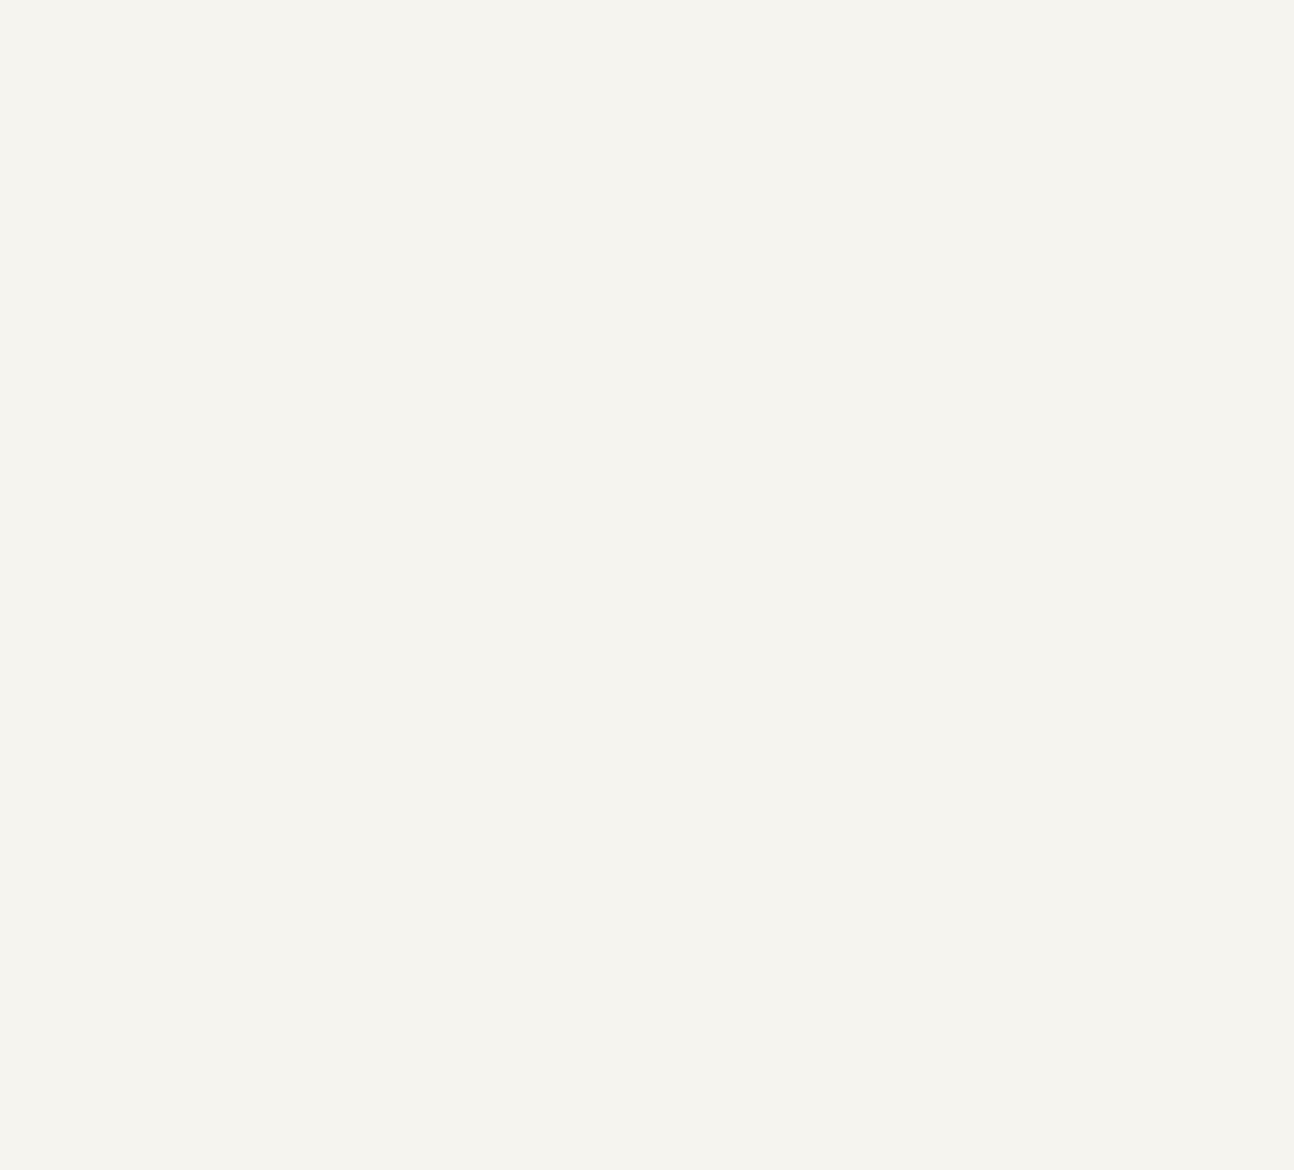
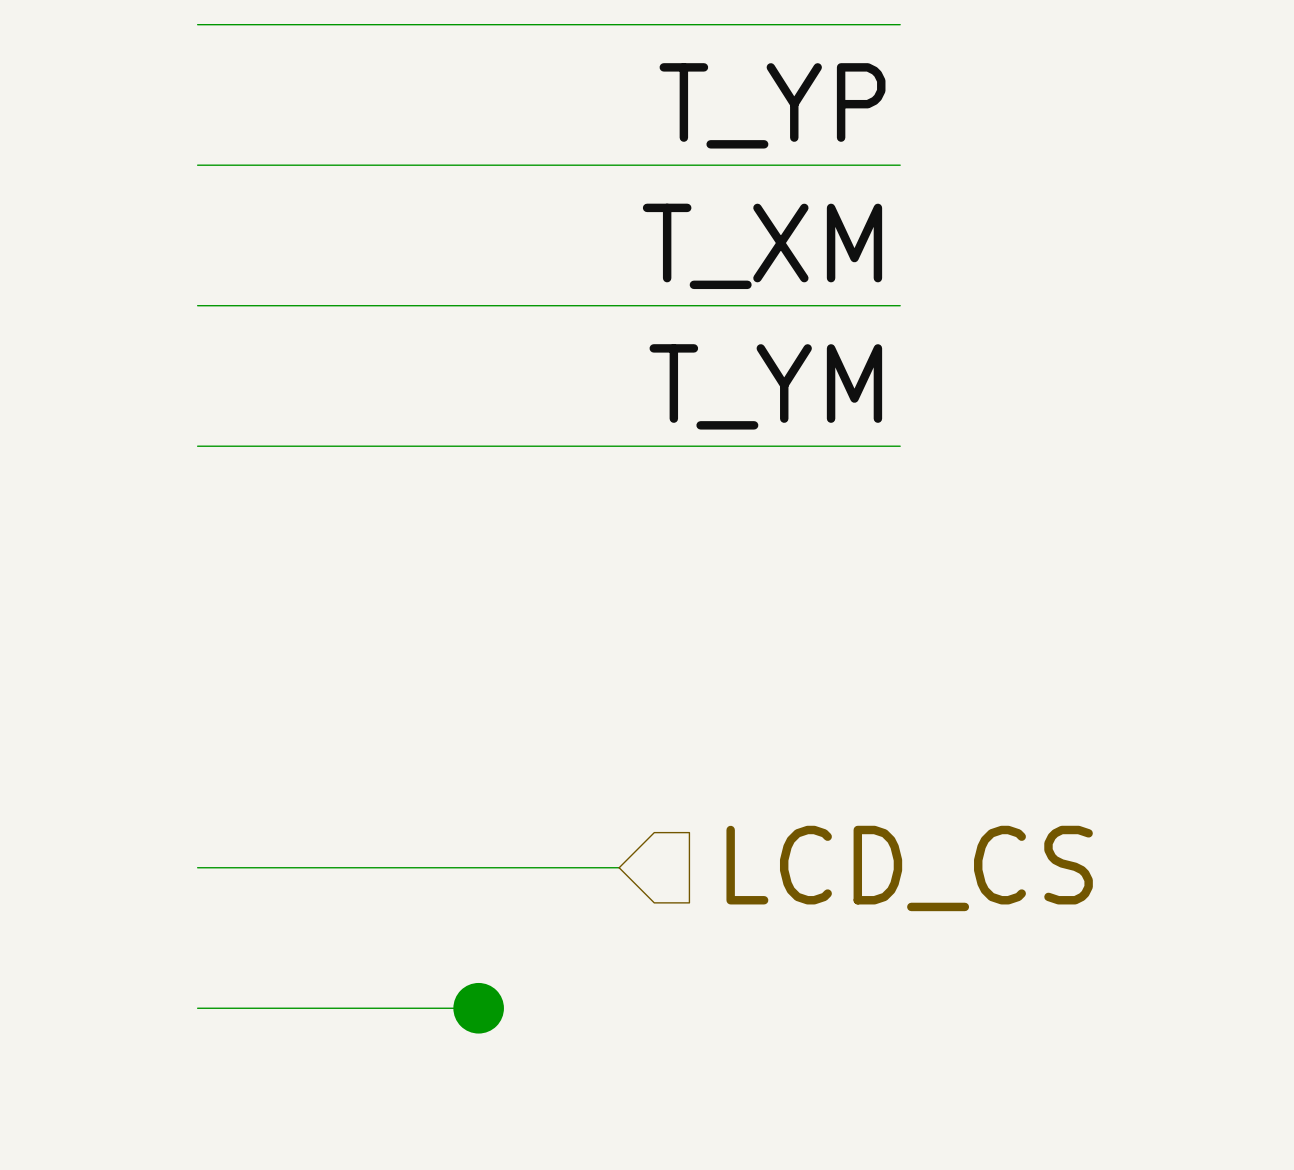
wire: none -> (197, 24) (900, 24)
label: none -> T_YP (772, 105)
wire: none -> (197, 165) (900, 165)
label: none -> T_XM (762, 246)
wire: none -> (197, 305) (900, 305)
label: none -> T_YM (765, 386)
wire: none -> (197, 446) (900, 446)
wire: none -> (197, 867) (619, 867)
hierarchical label: none -> LCD_CS (909, 868)
wire: none -> (197, 1008) (478, 1008)
junction: none -> (478, 1008)

